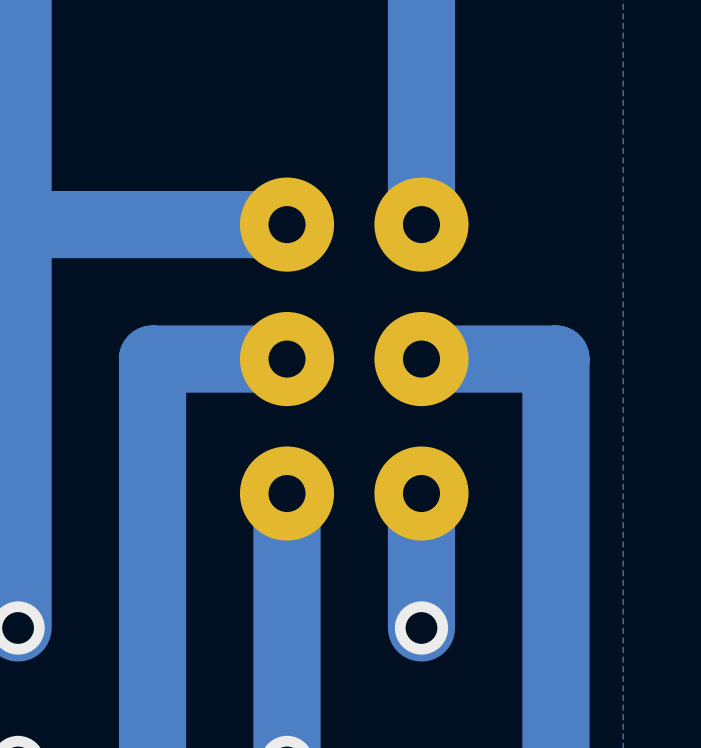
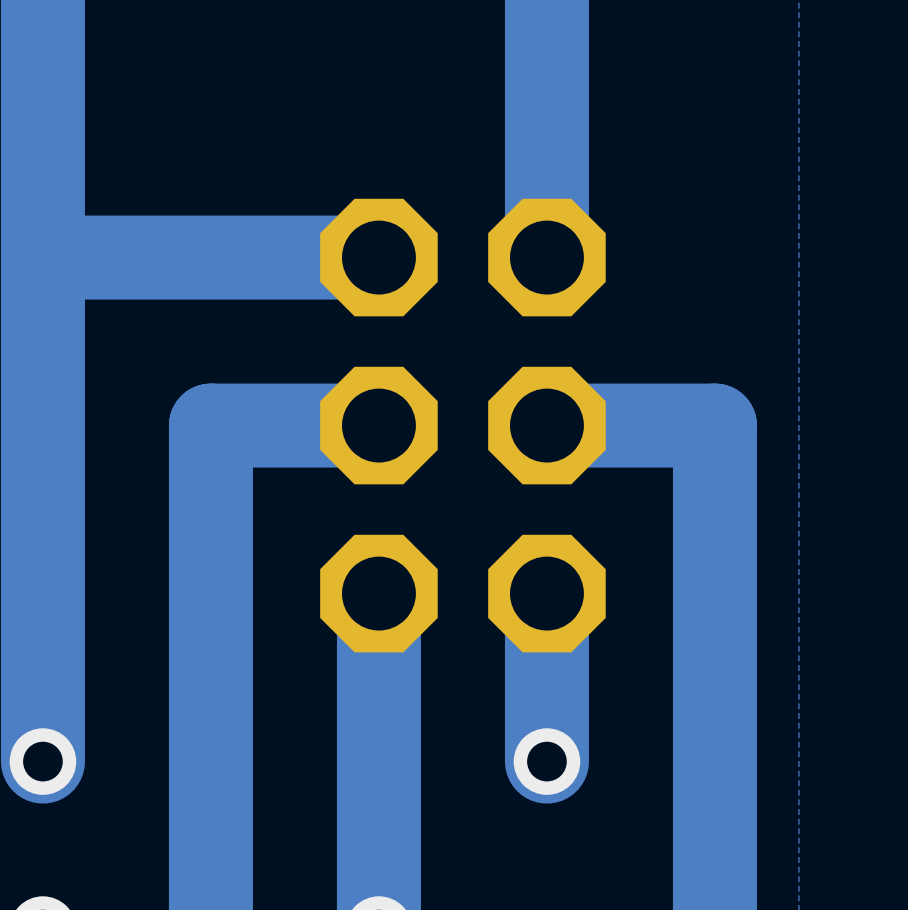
part footprint: [239, 177, 469, 541] -> [320, 198, 606, 653]

